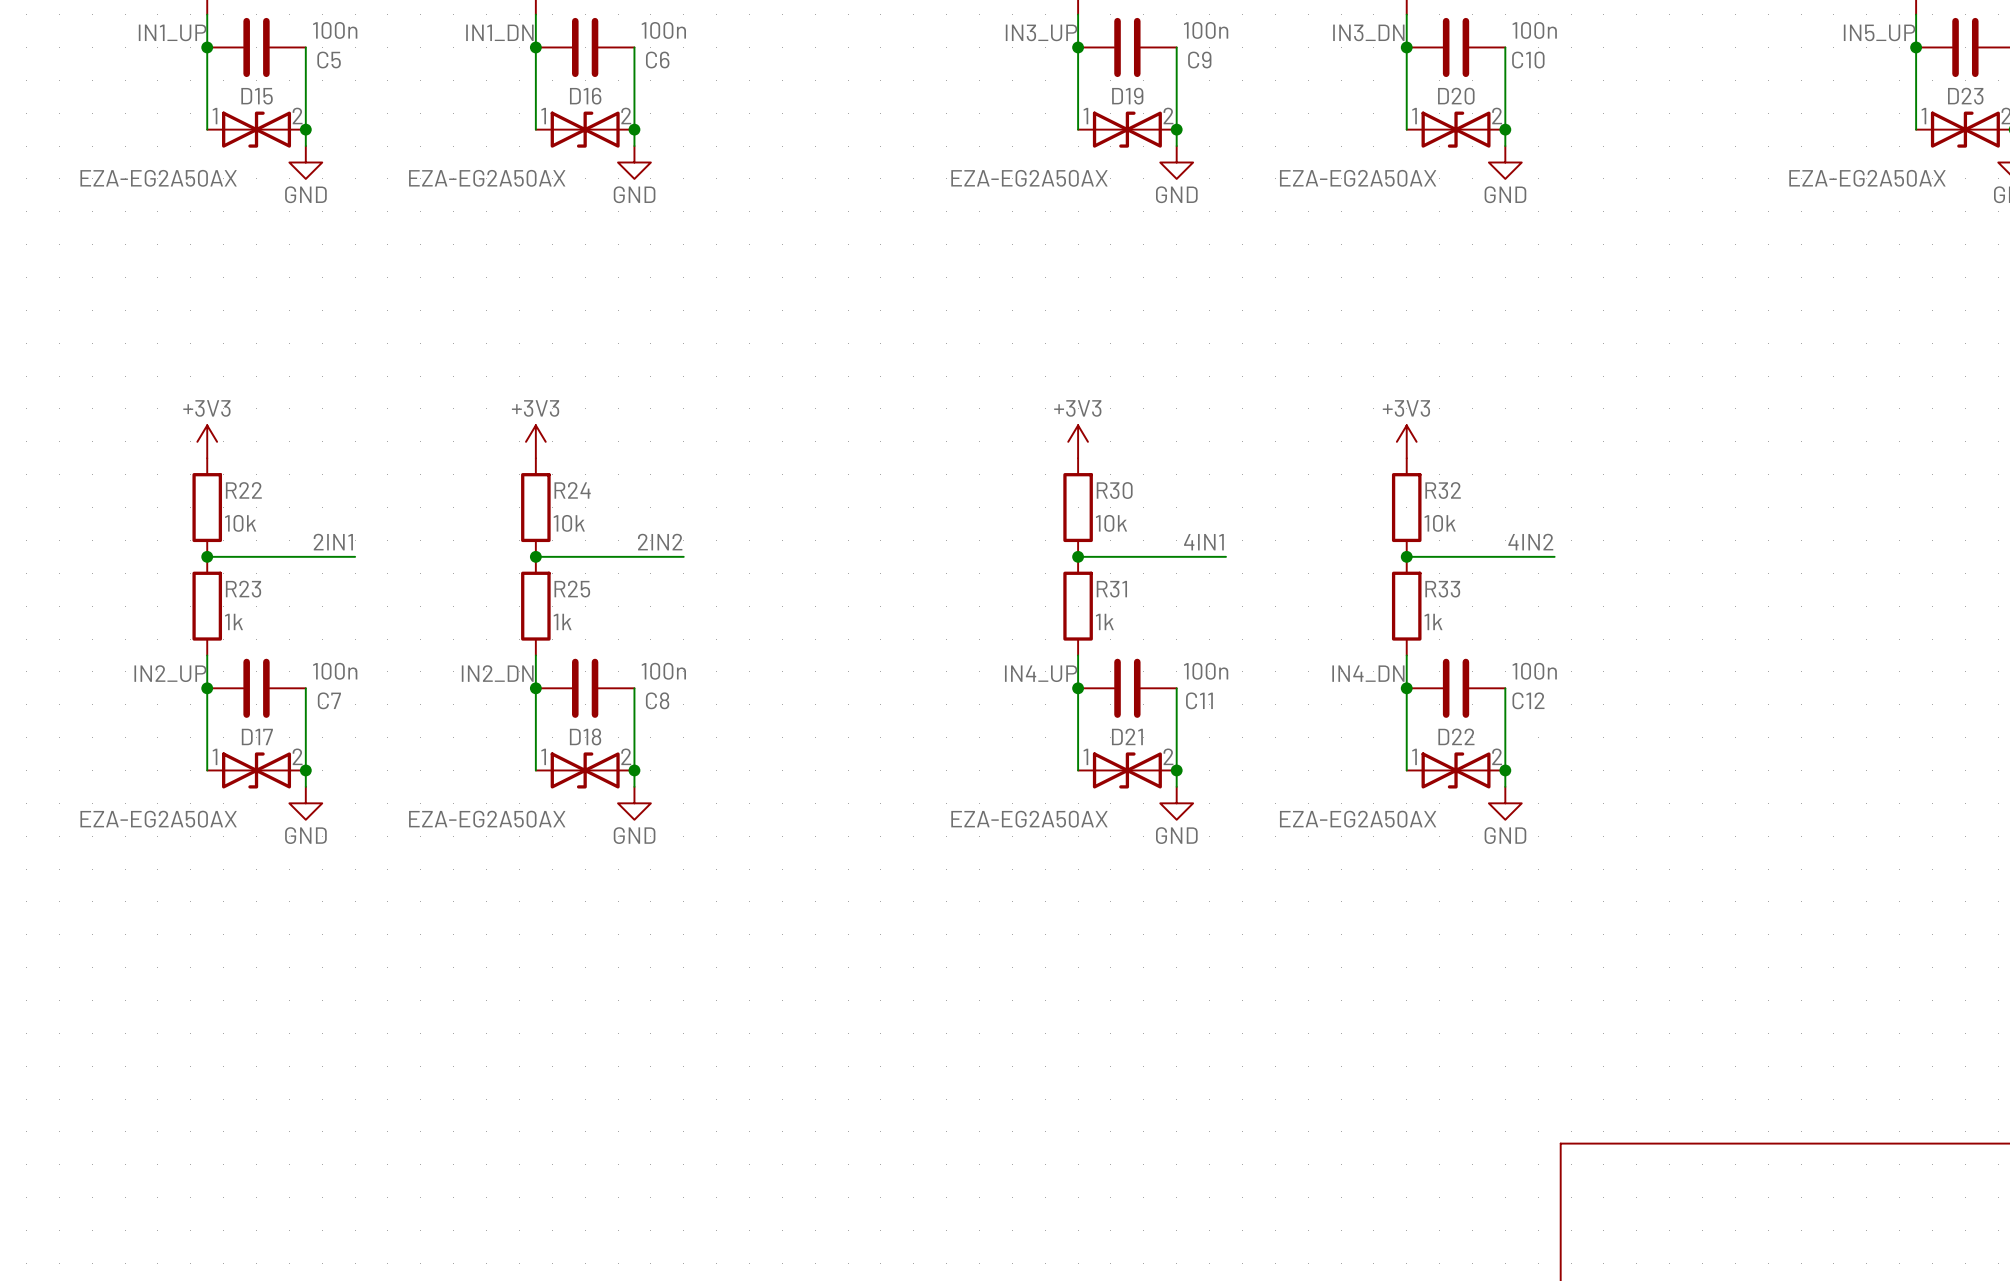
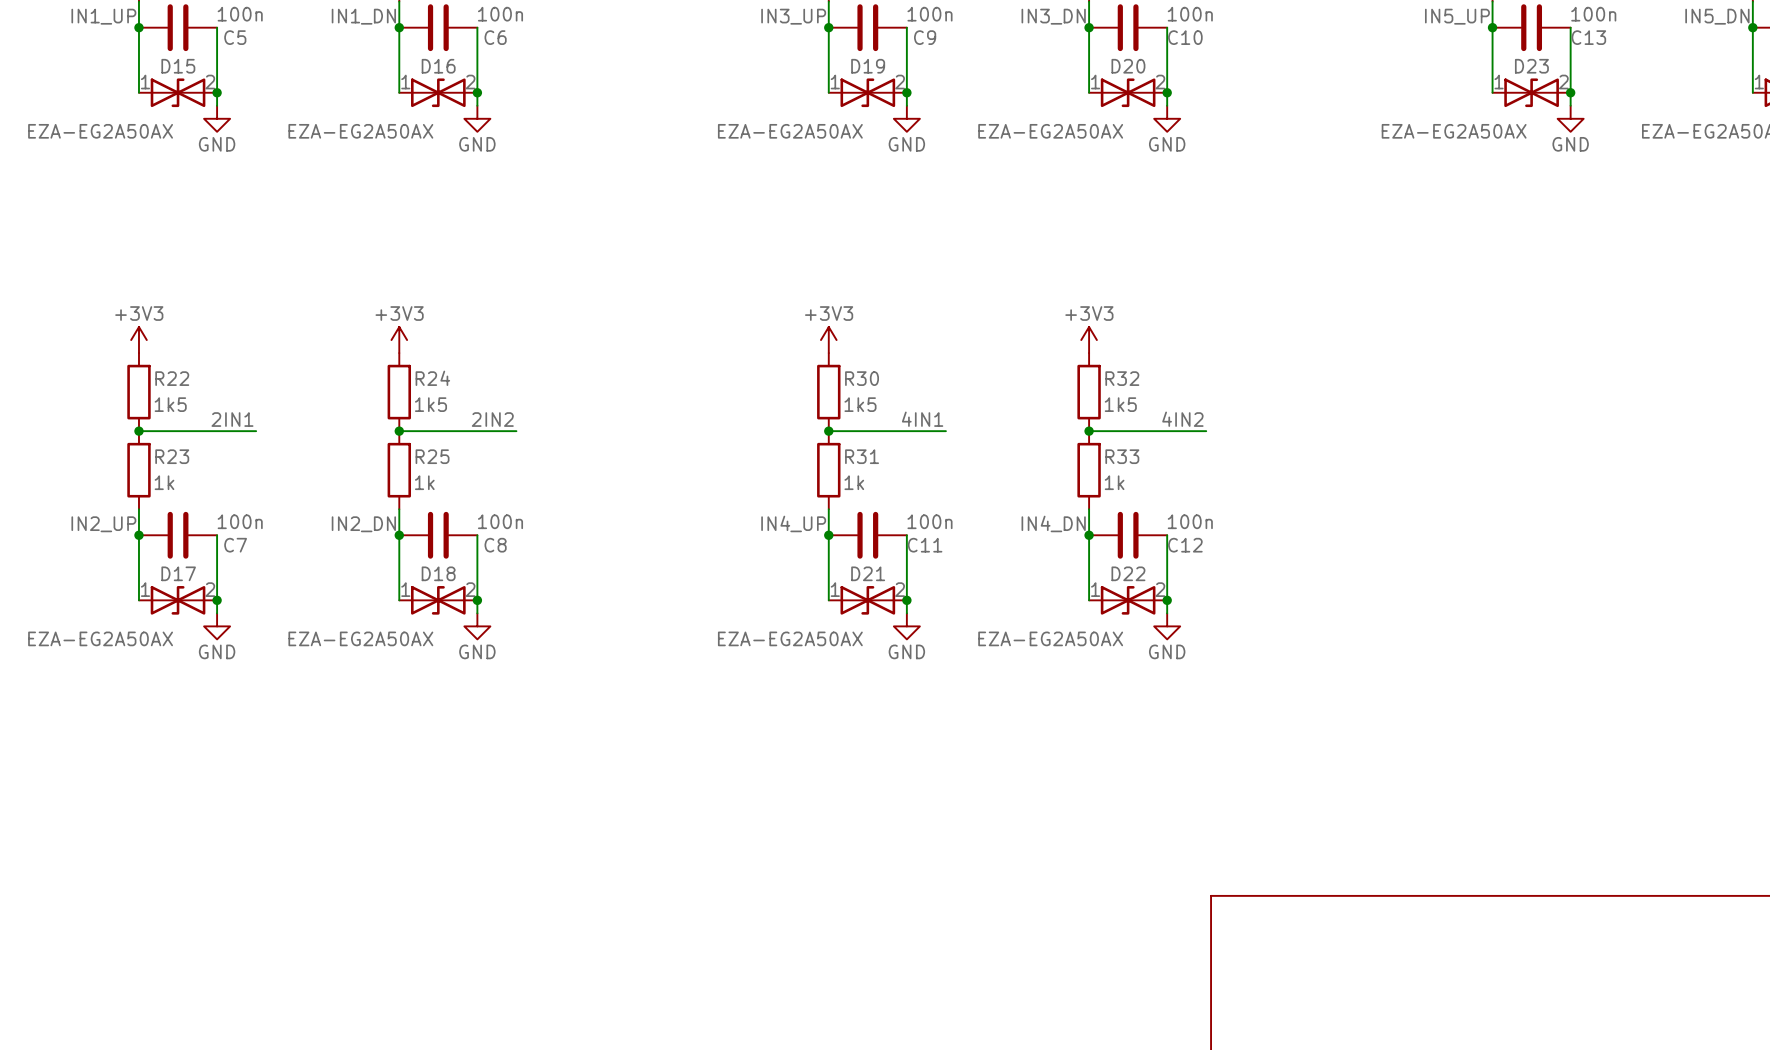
R22 value: 10k (240, 523) -> 1k5 (170, 404)
R24 value: 10k (569, 523) -> 1k5 (430, 404)
R30 value: 10k (1111, 523) -> 1k5 (860, 404)
R32 value: 10k (1440, 523) -> 1k5 (1120, 404)

